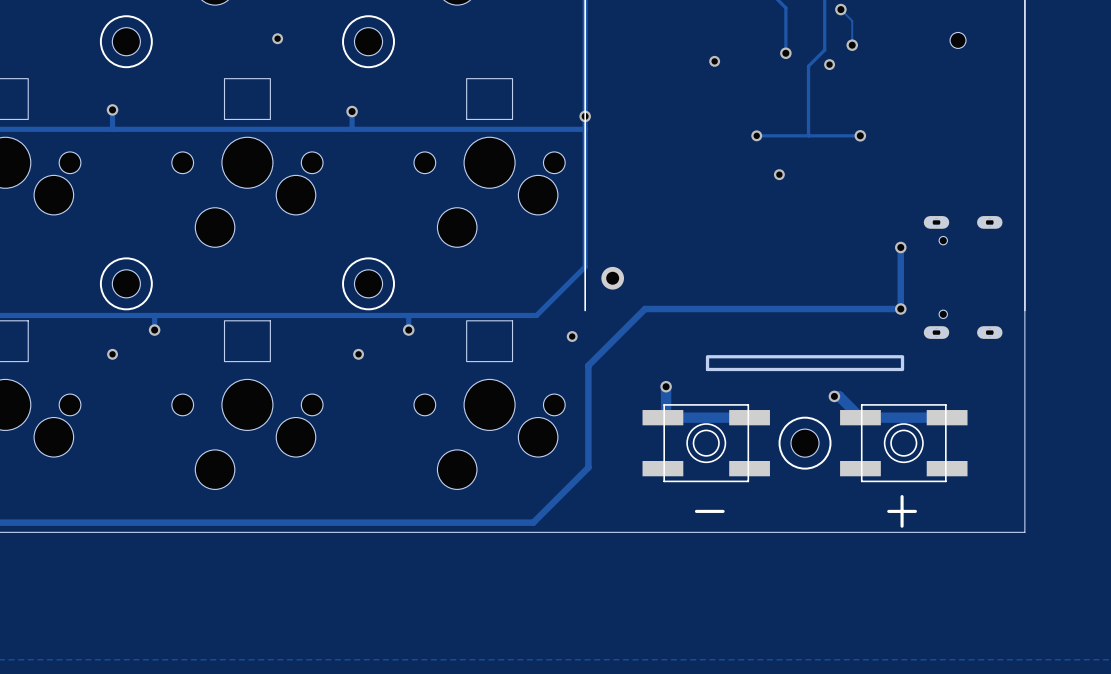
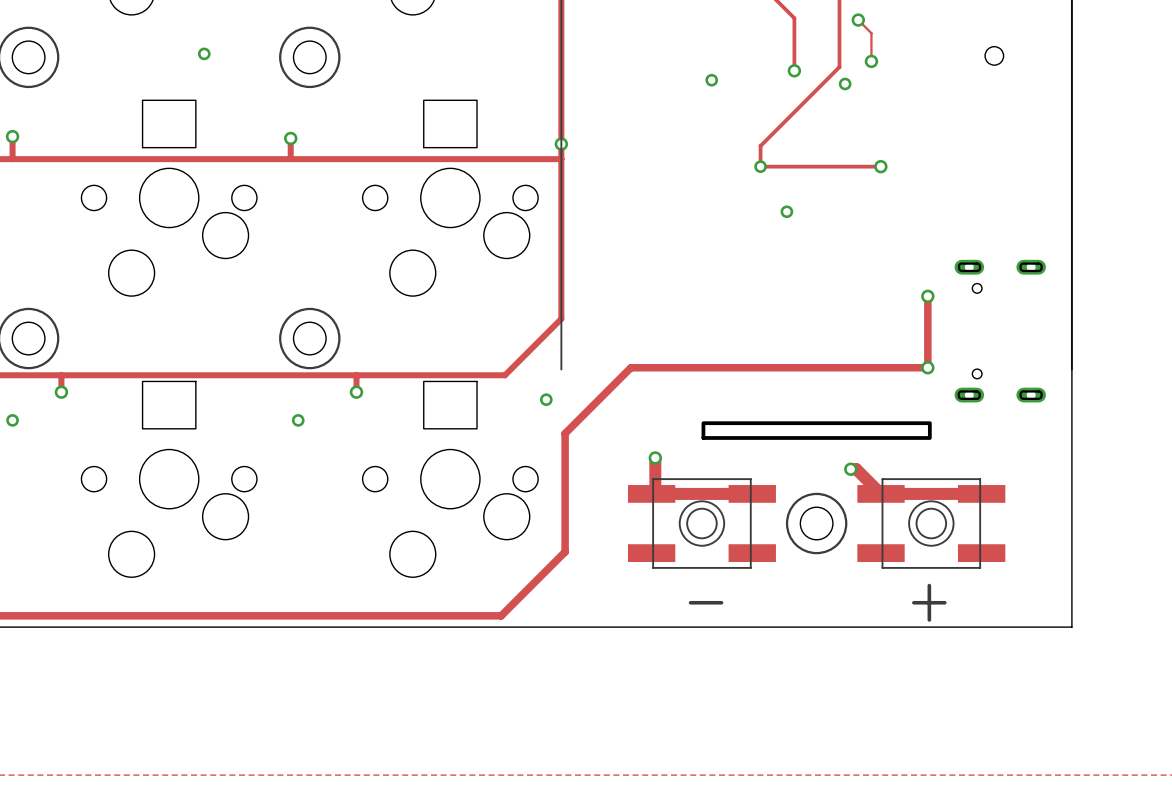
track: (808, 66) (808, 135) -> (820, 85) (760, 145) (760, 166)
part: (612, 278) -> none

